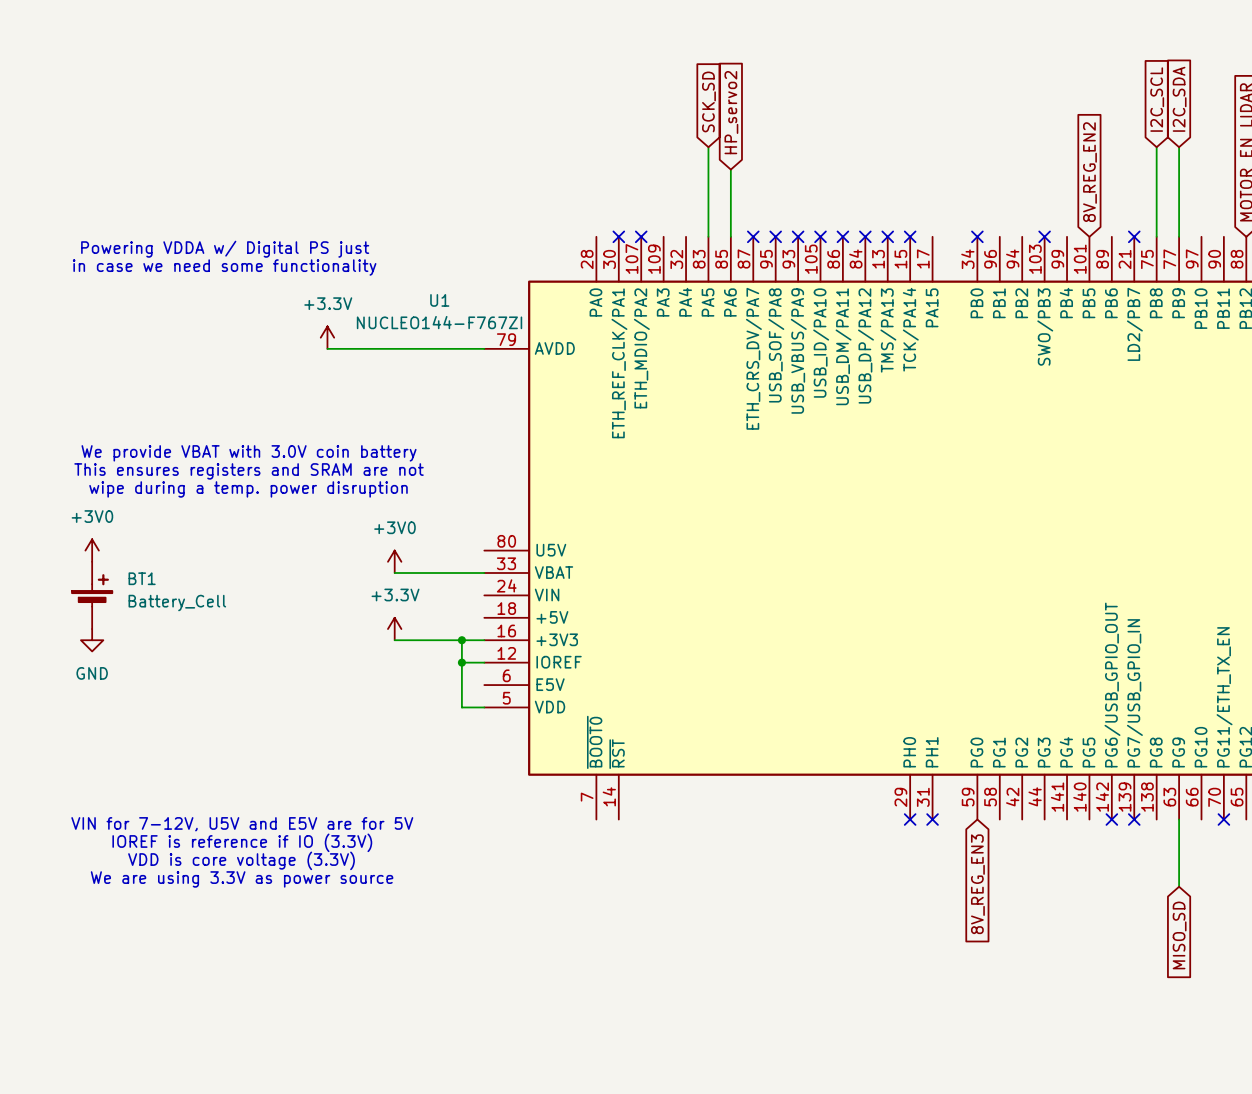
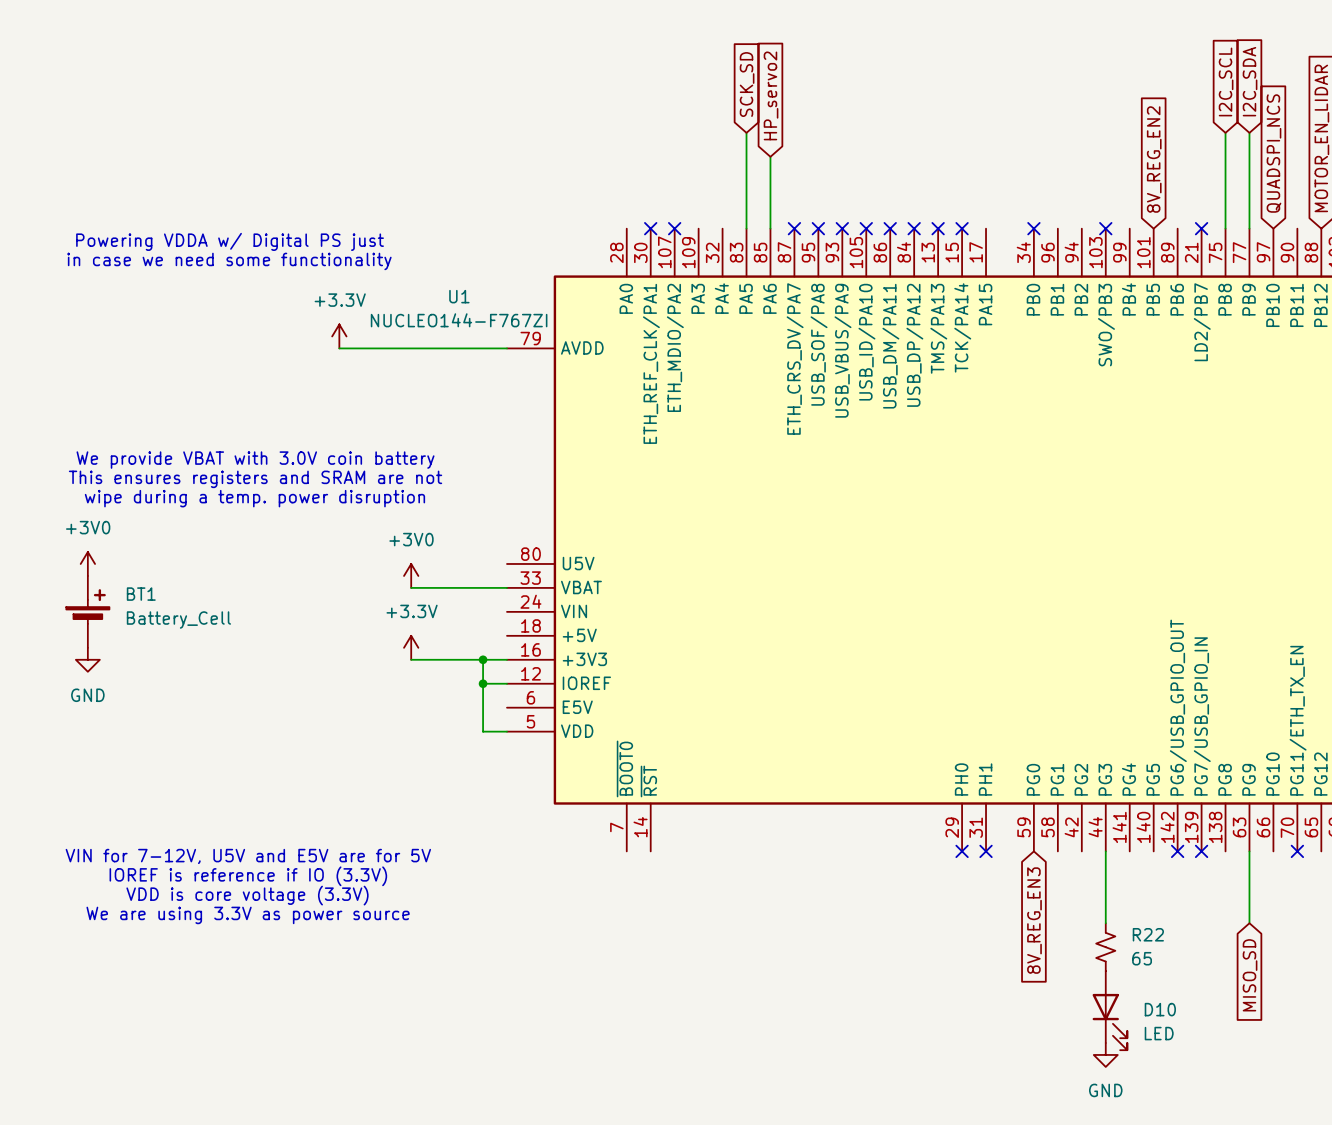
global label: none -> QUADSPI_NCS (1273, 153)
wire: none -> (1105, 851) (1105, 923)
R22: none -> 65 (1105, 947)
D10: none -> LED (1109, 1010)
power symbol: none -> GND (1105, 1054)

